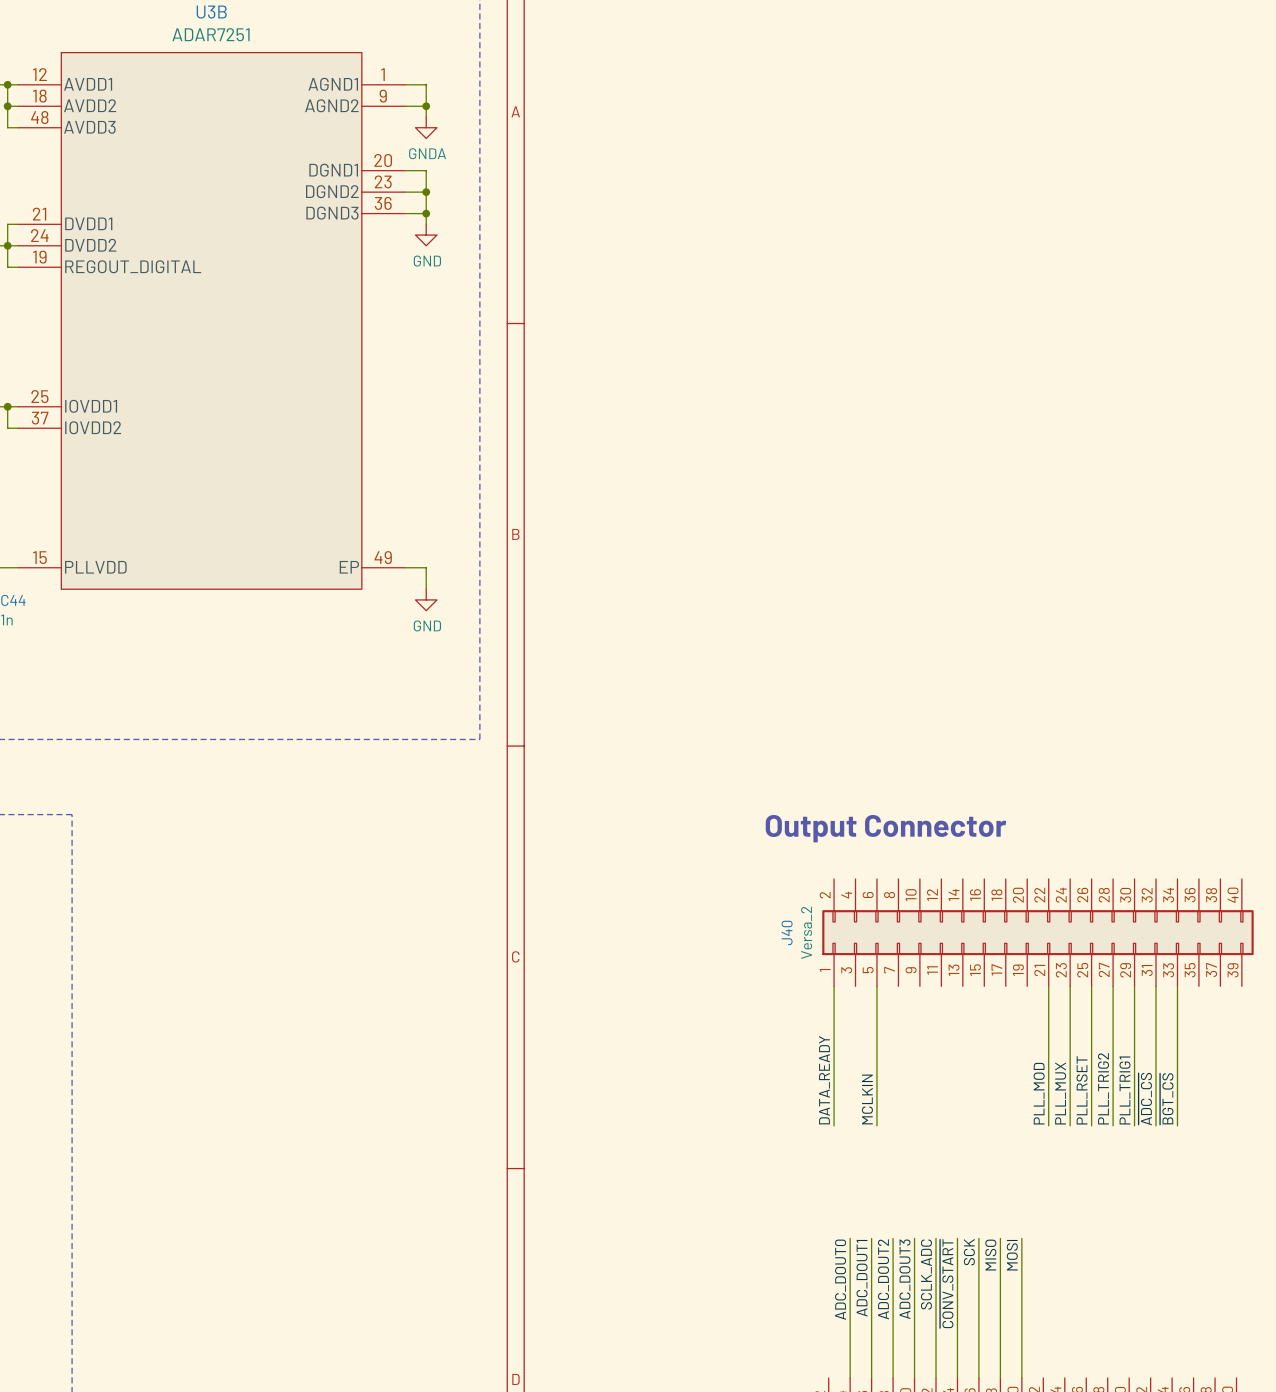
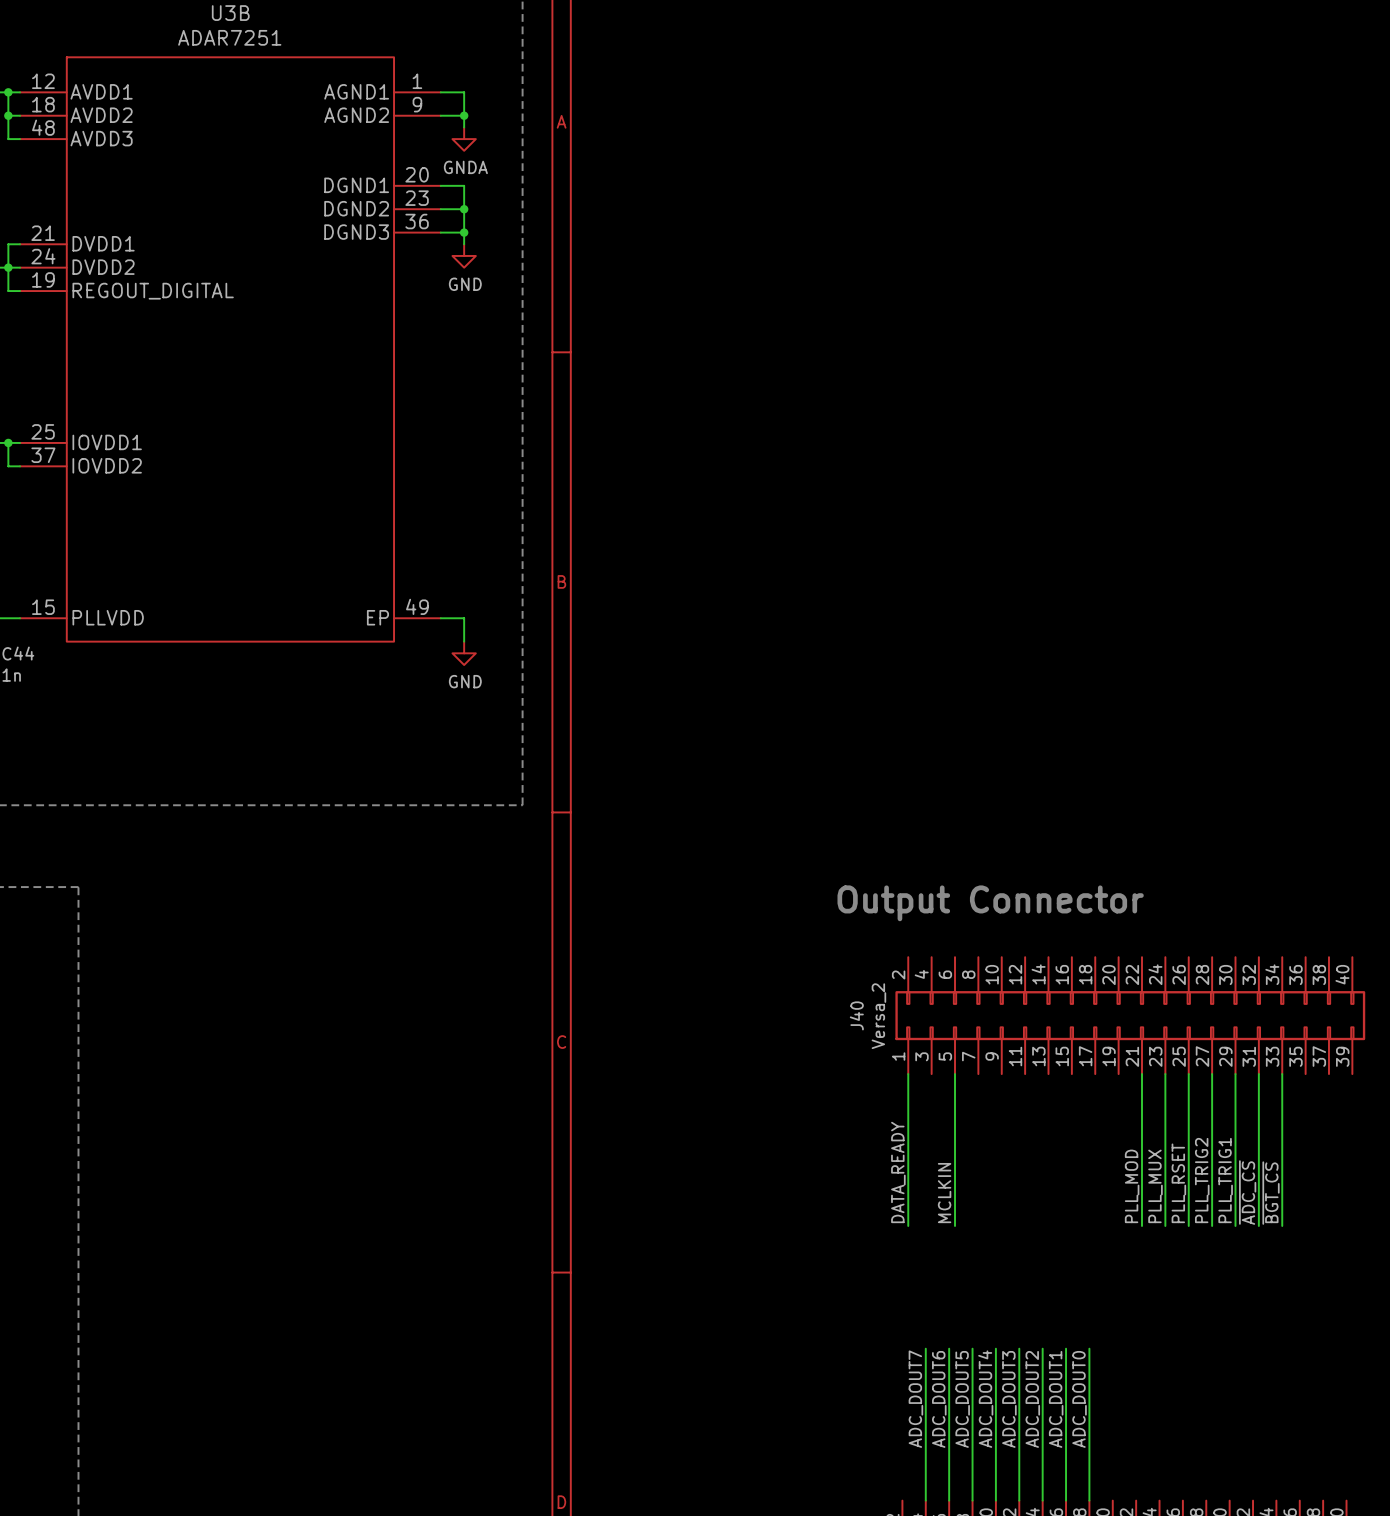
wire: (1021, 1238) (1021, 1378) -> none
label: SCK (969, 1252) -> ADC_DOUT1 (1056, 1399)
label: MISO (990, 1255) -> ADC_DOUT0 (1079, 1399)
label: MOSI (1012, 1255) -> none
label: SCLK_ADC (926, 1274) -> ADC_DOUT3 (1009, 1399)
label: ADC_DOUT1 (862, 1278) -> ADC_DOUT6 (939, 1399)
label: ADC_DOUT0 (840, 1279) -> ADC_DOUT7 (915, 1399)
label: ADC_DOUT2 (883, 1279) -> ADC_DOUT5 (962, 1399)
label: ADC_DOUT3 (904, 1279) -> ADC_DOUT4 (985, 1399)
label: ~{CONV_START} (946, 1283) -> ADC_DOUT2 (1032, 1399)

